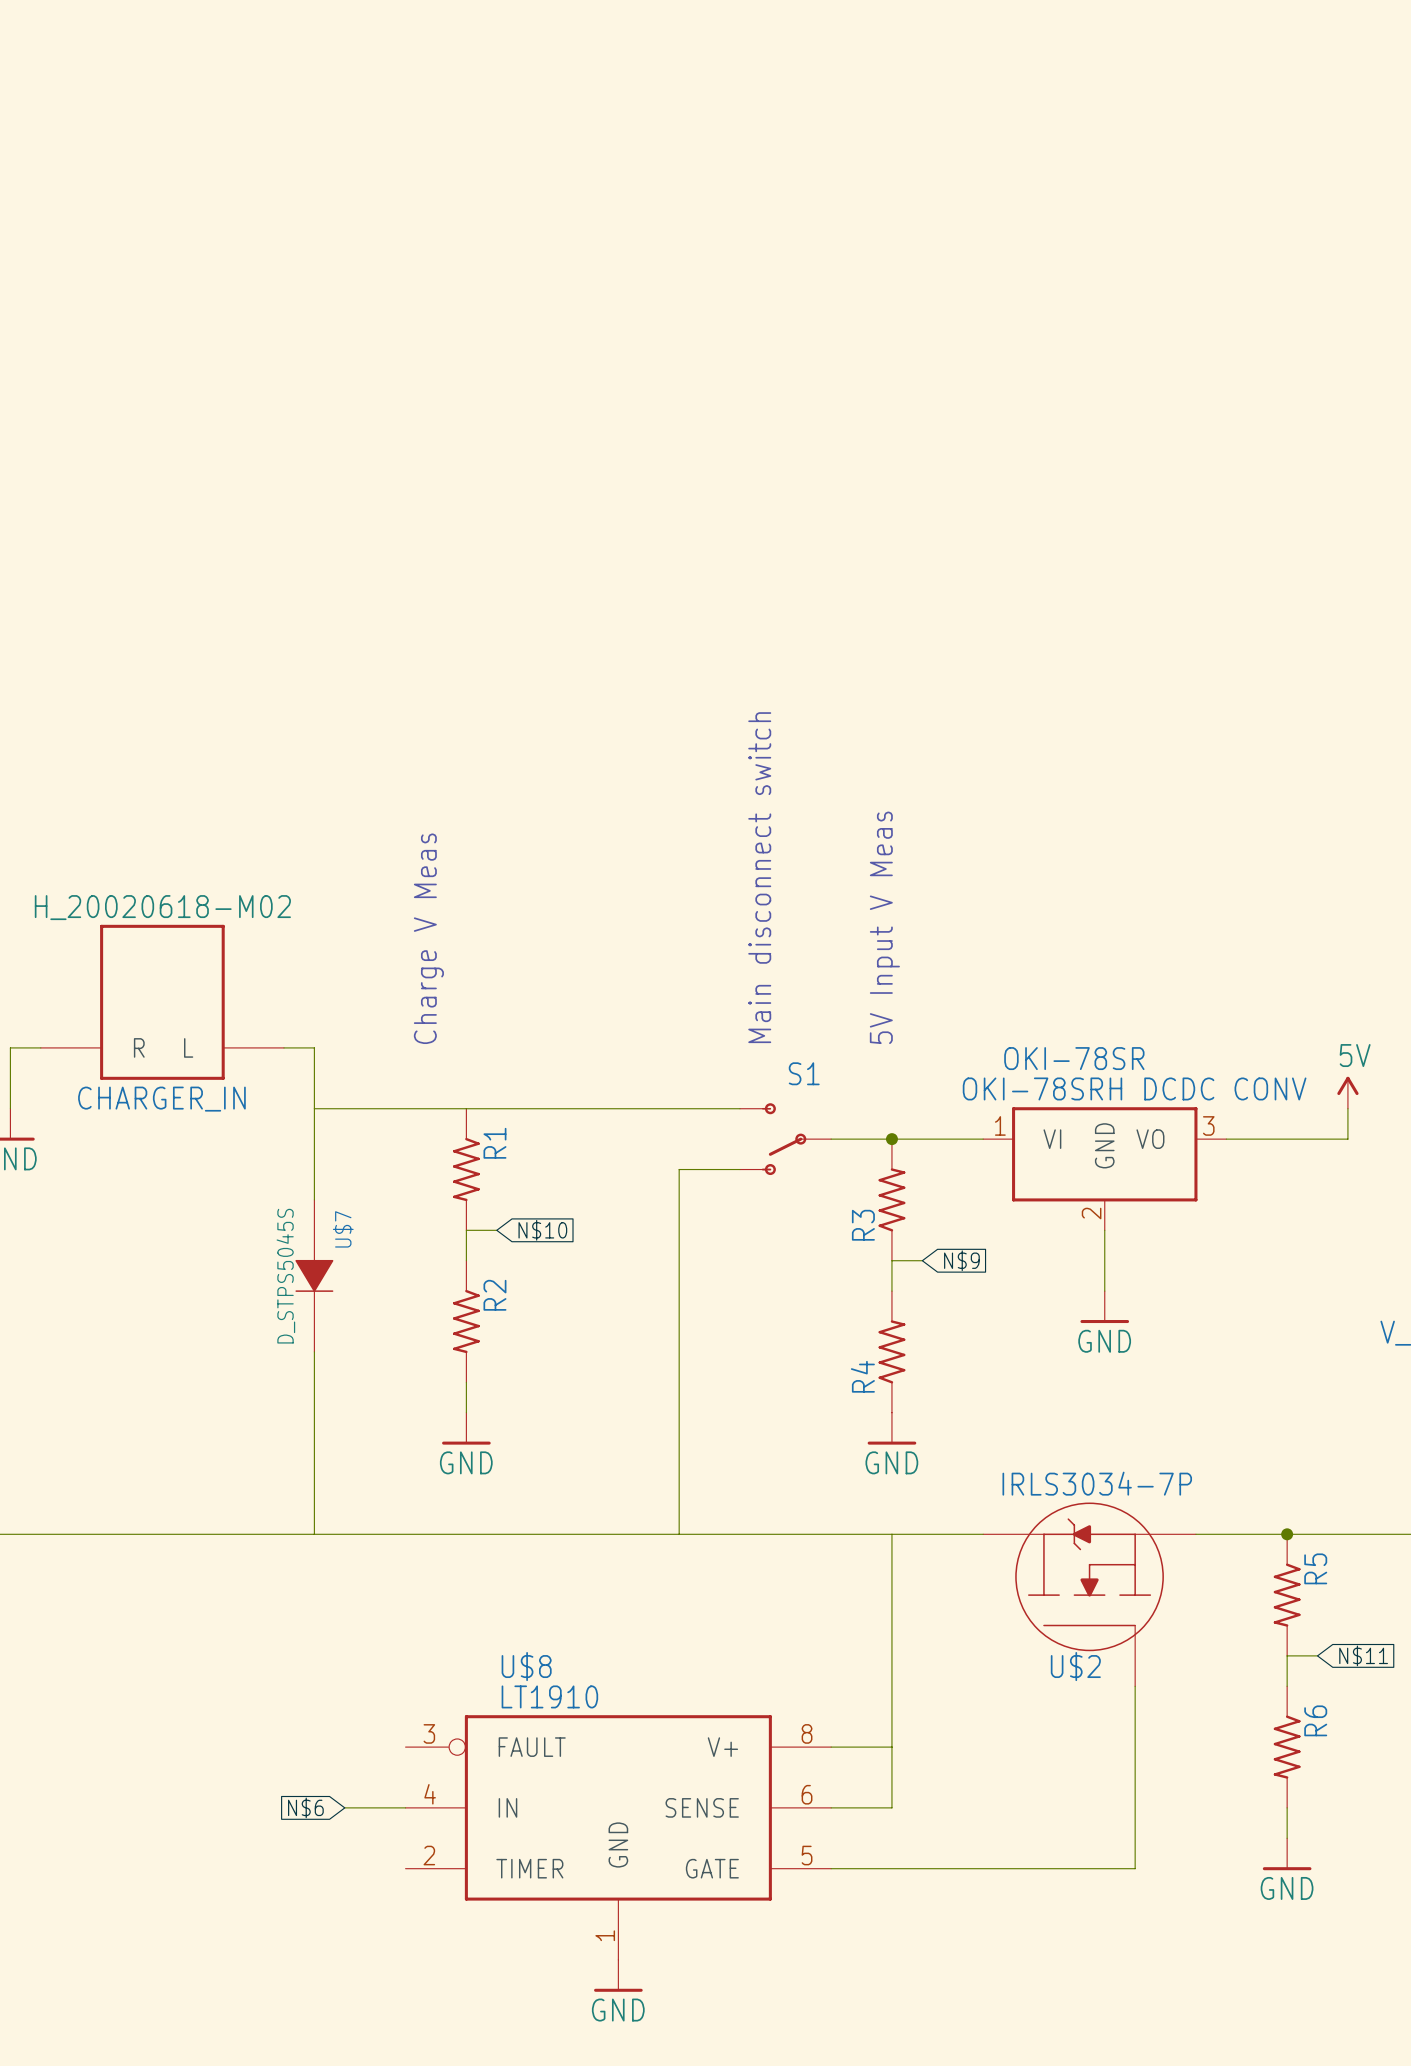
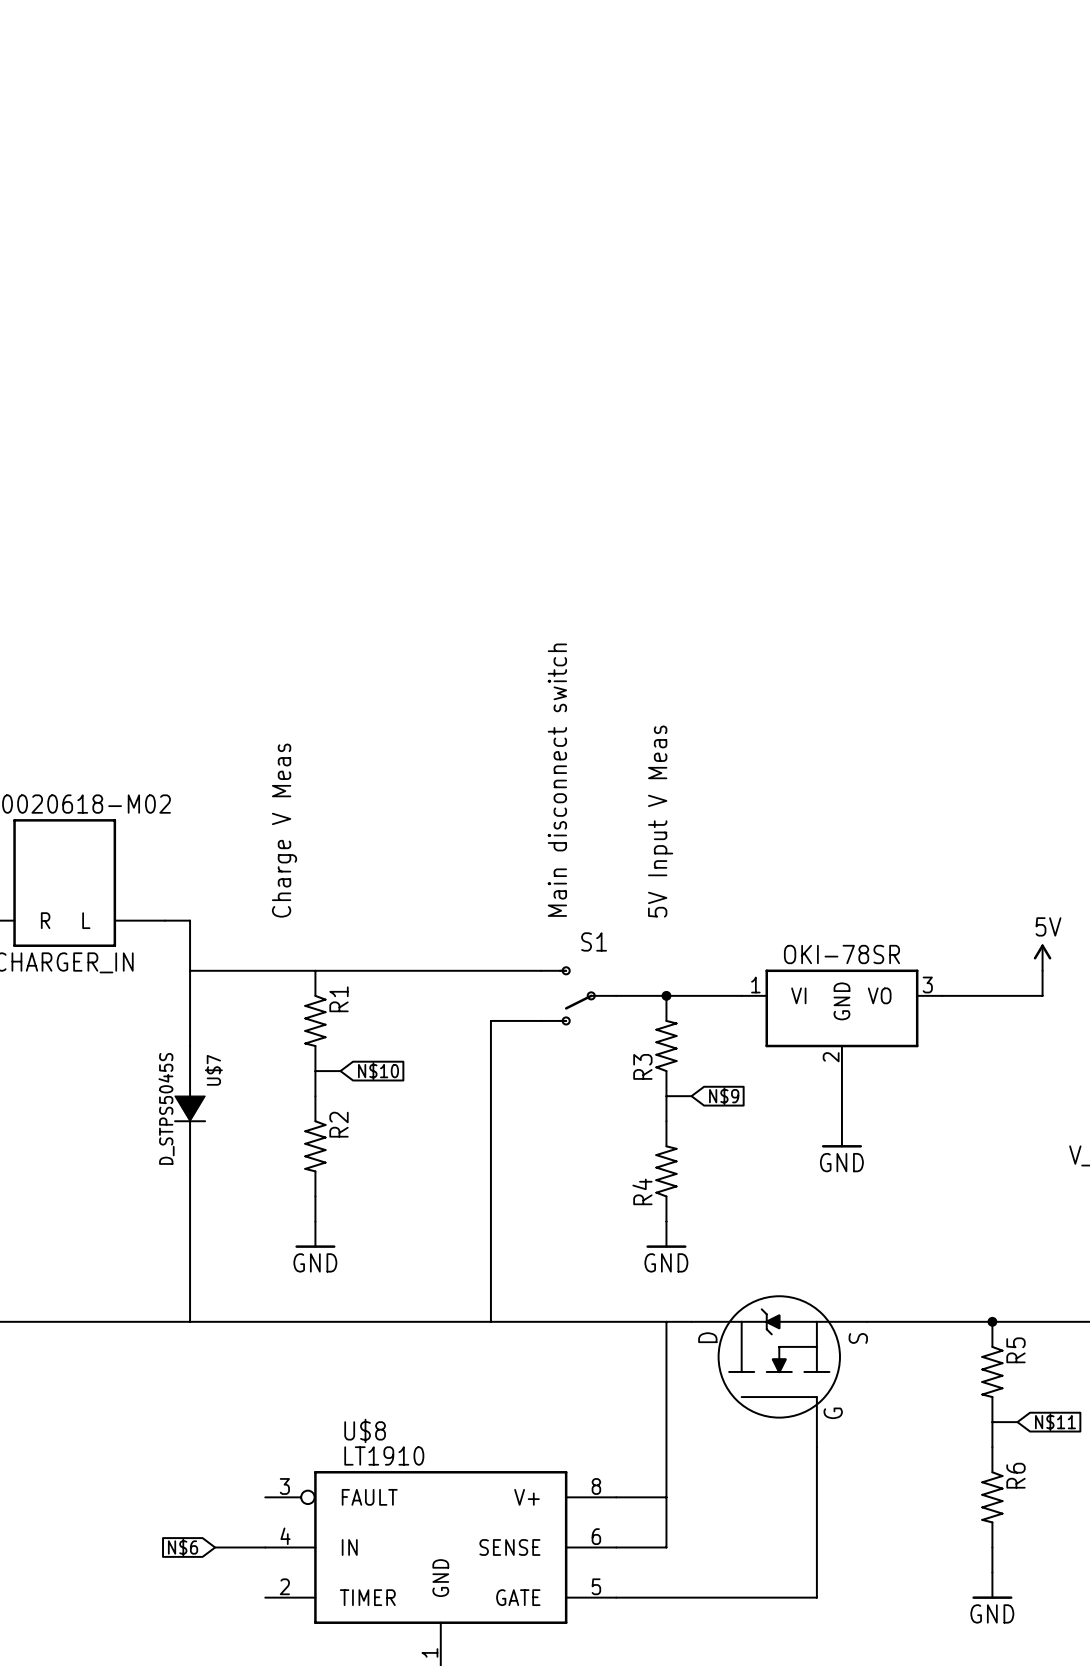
OKI-78SR name position: OKI-78SR (1074, 1058) -> OKI-78SR (841, 954)
OKI-78SR text: OKI-78SRH DCDC CONV (1134, 1088) -> none
part: none -> (779, 1371)
U$2: (1089, 1594) -> none
wire: (1135, 1686) (1135, 1868) (1074, 1868) -> (816, 1447) (816, 1597)

